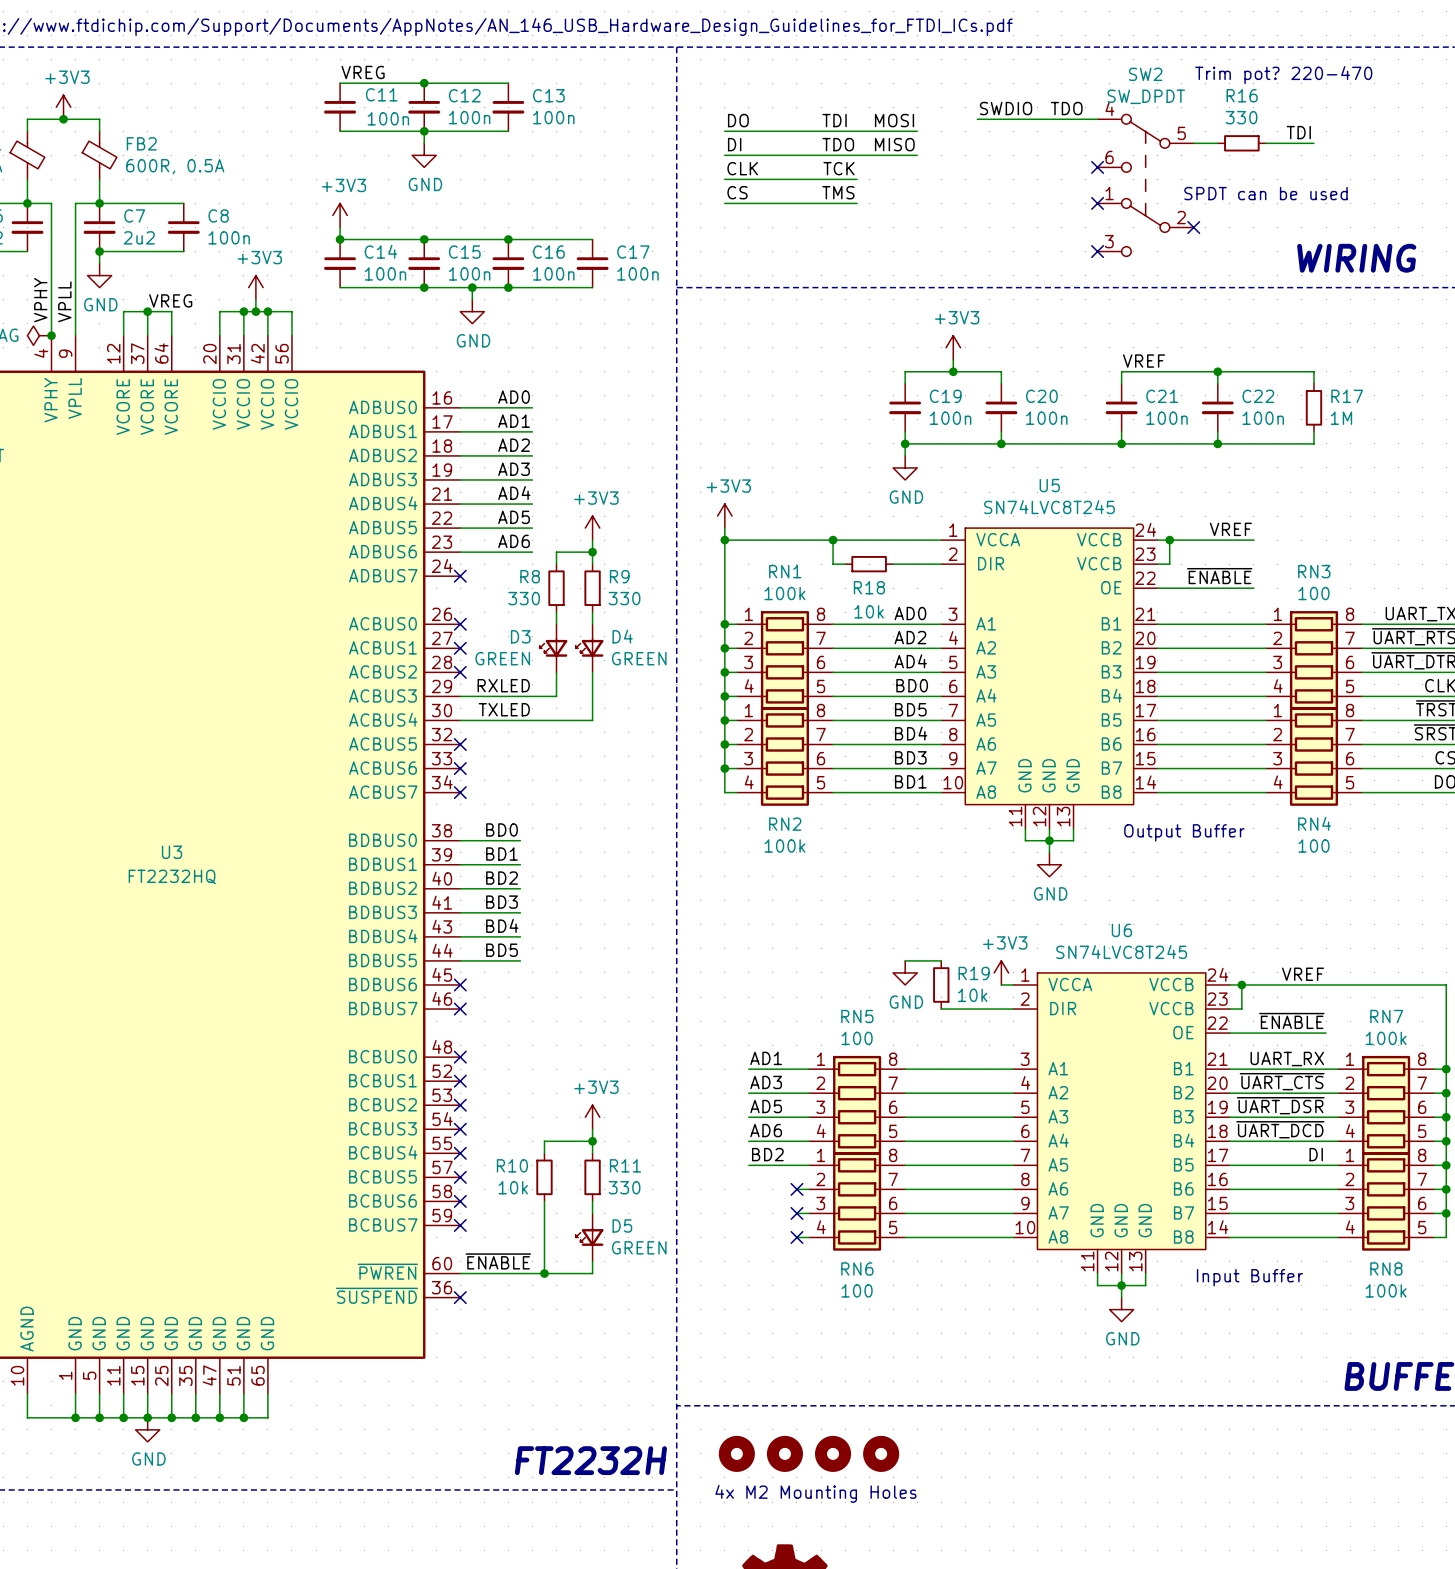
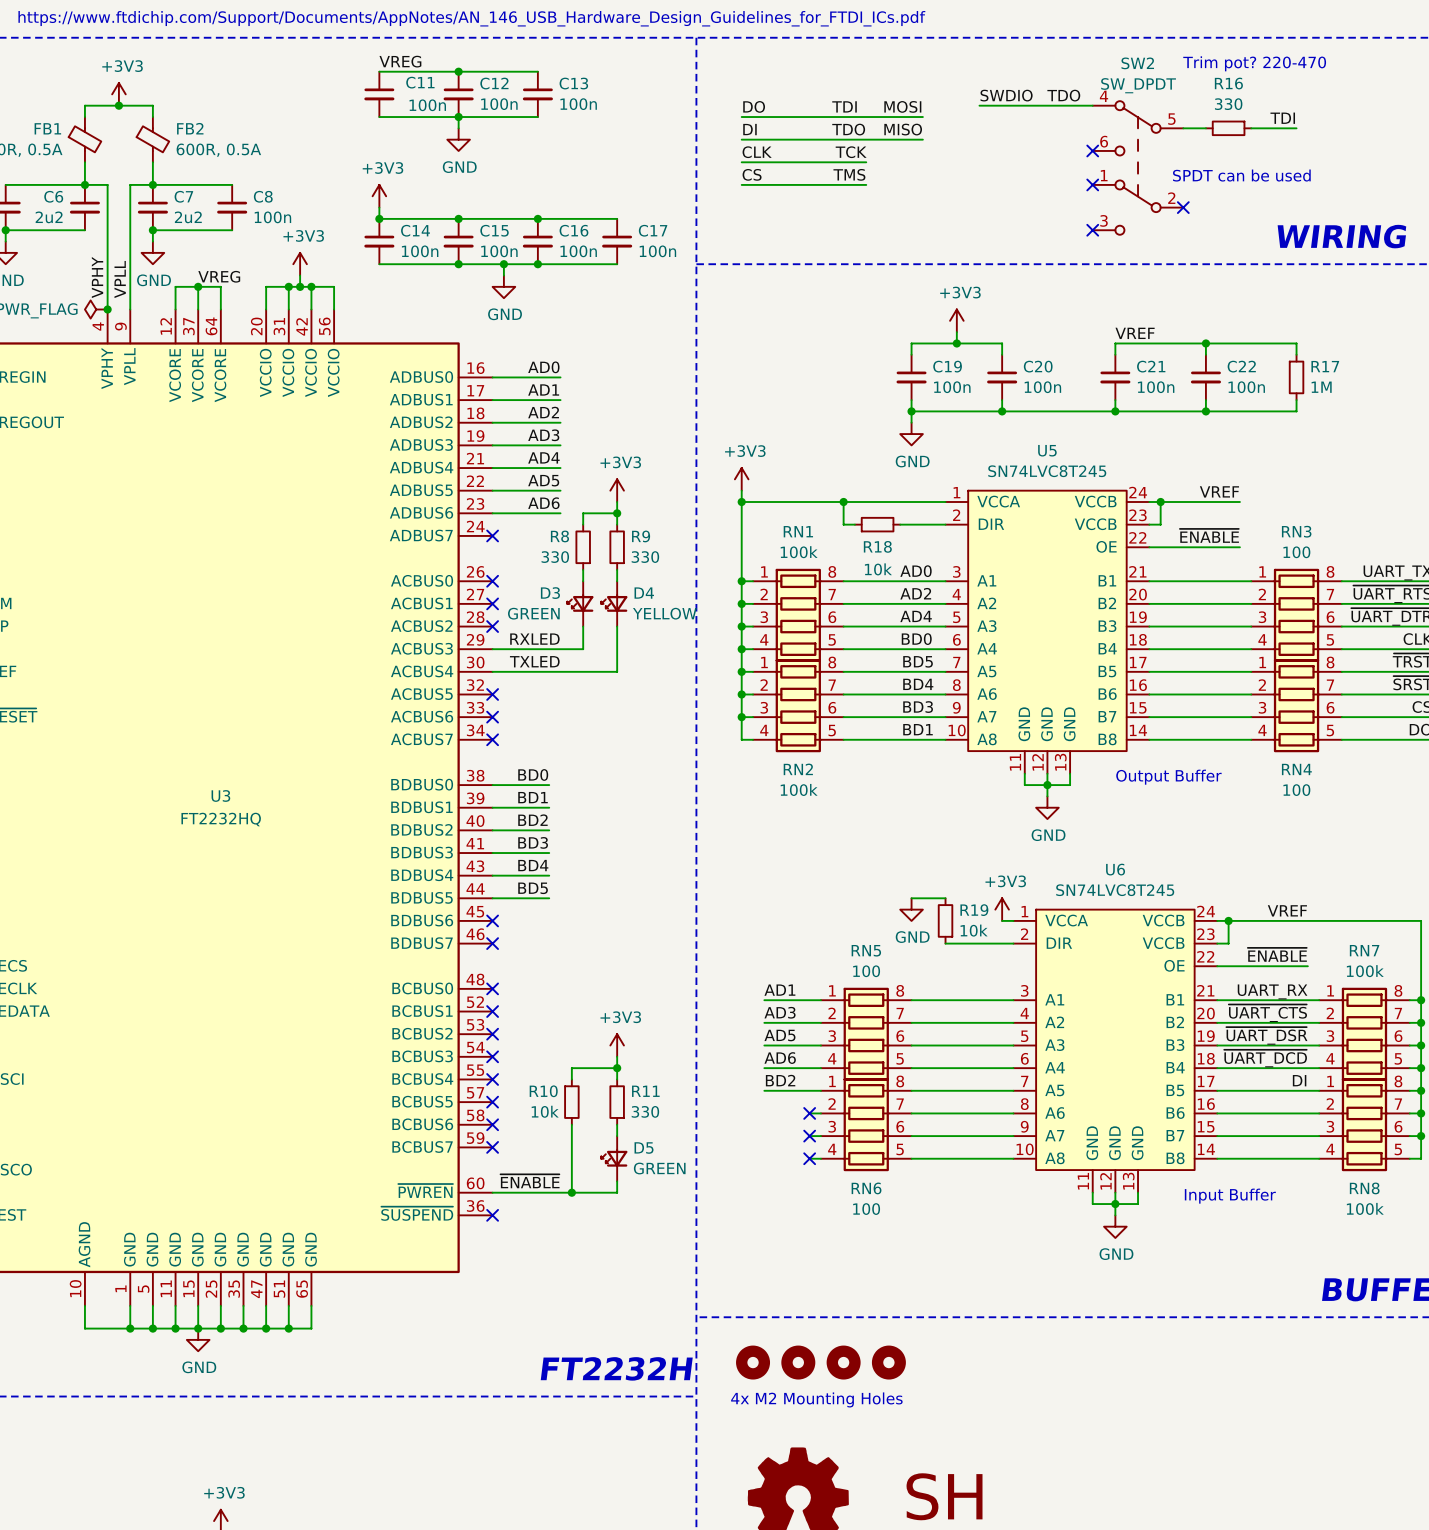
D4 value: GREEN (639, 658) -> YELLOW (664, 613)

